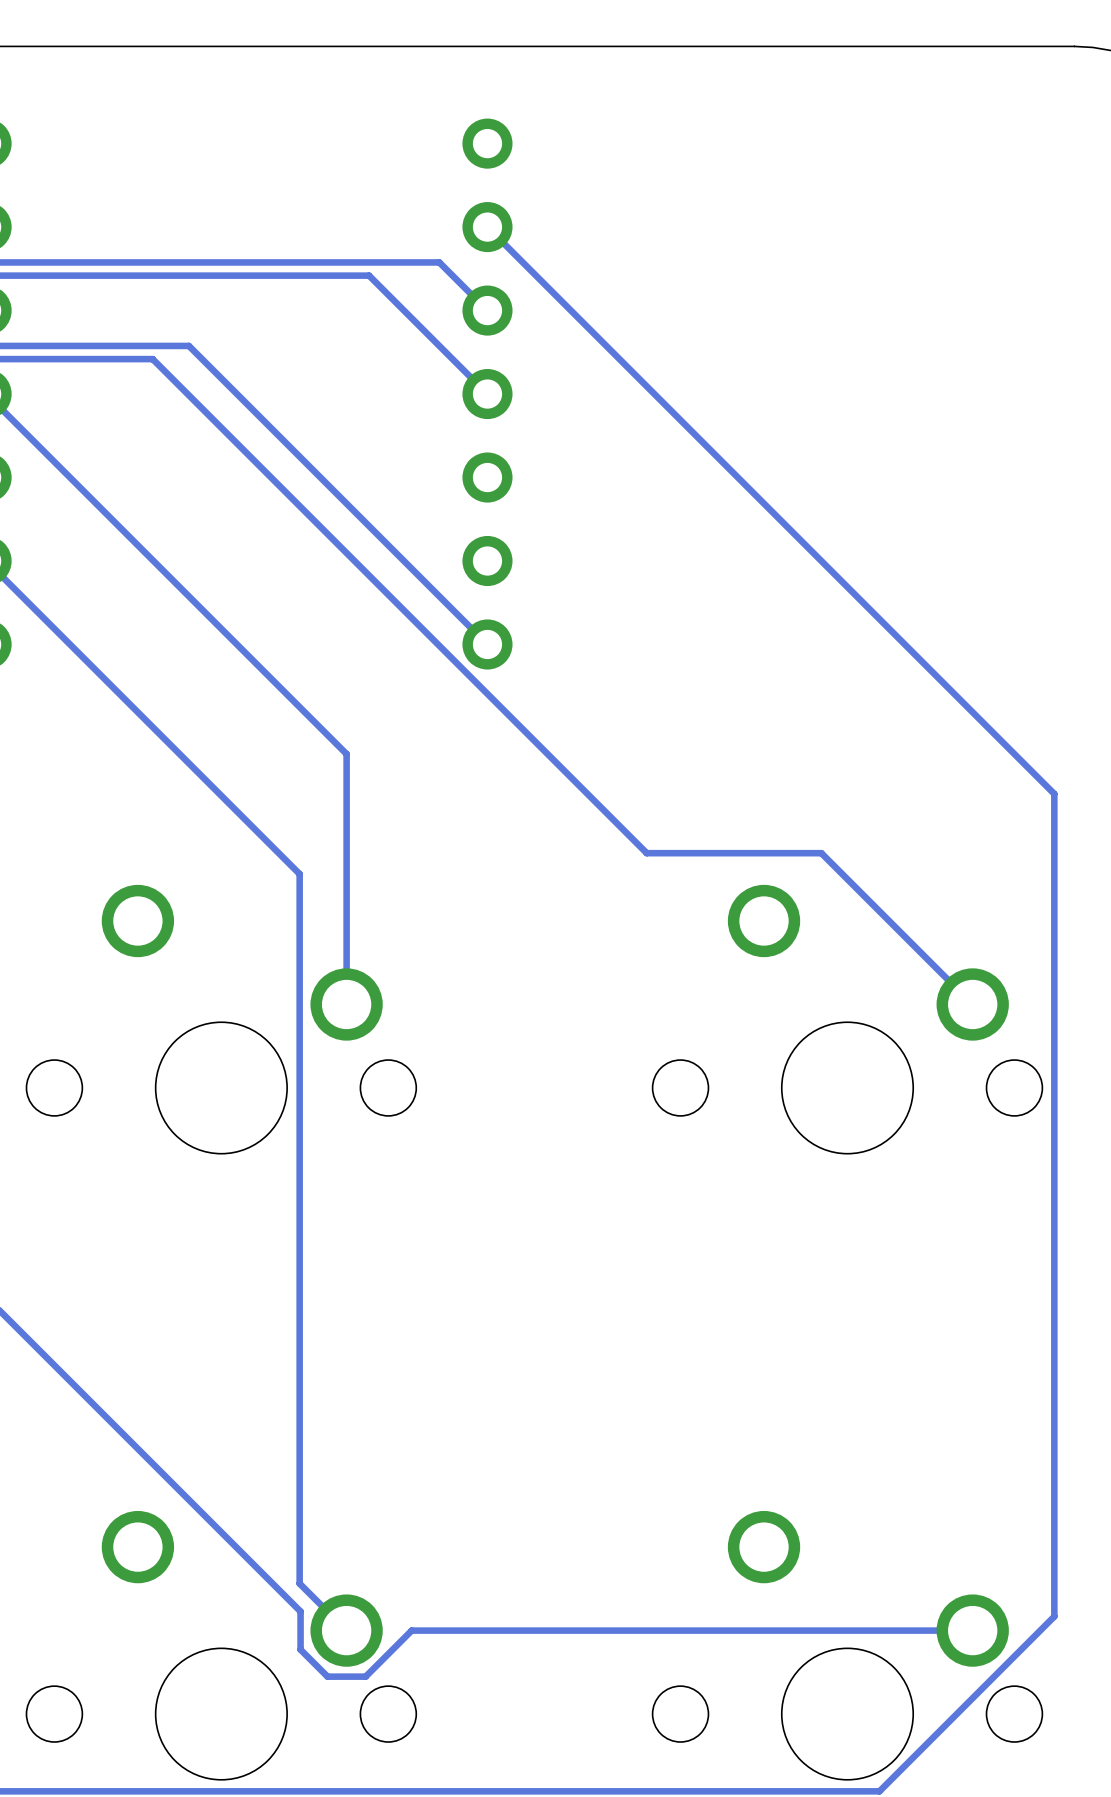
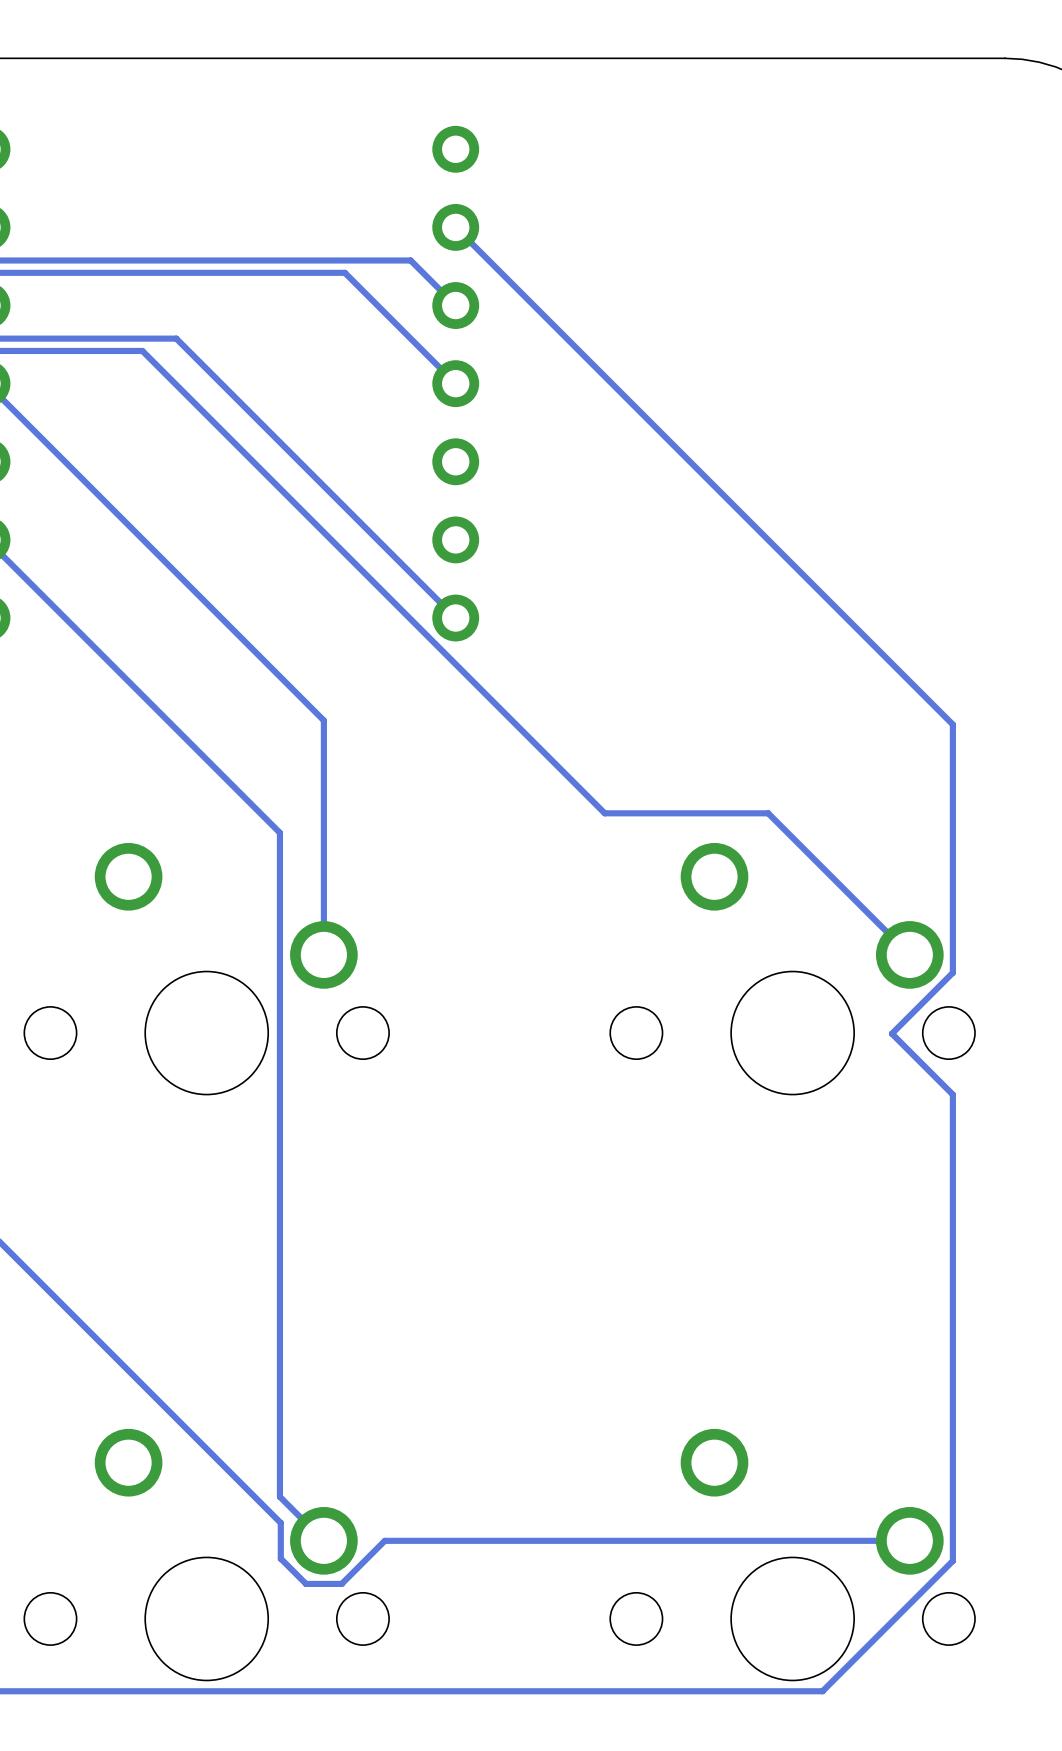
track: (1018, 758) (1054, 793) (1054, 1616) (1018, 1652) -> (952, 724) (952, 972) (891, 1033) (952, 1094) (952, 1560)

